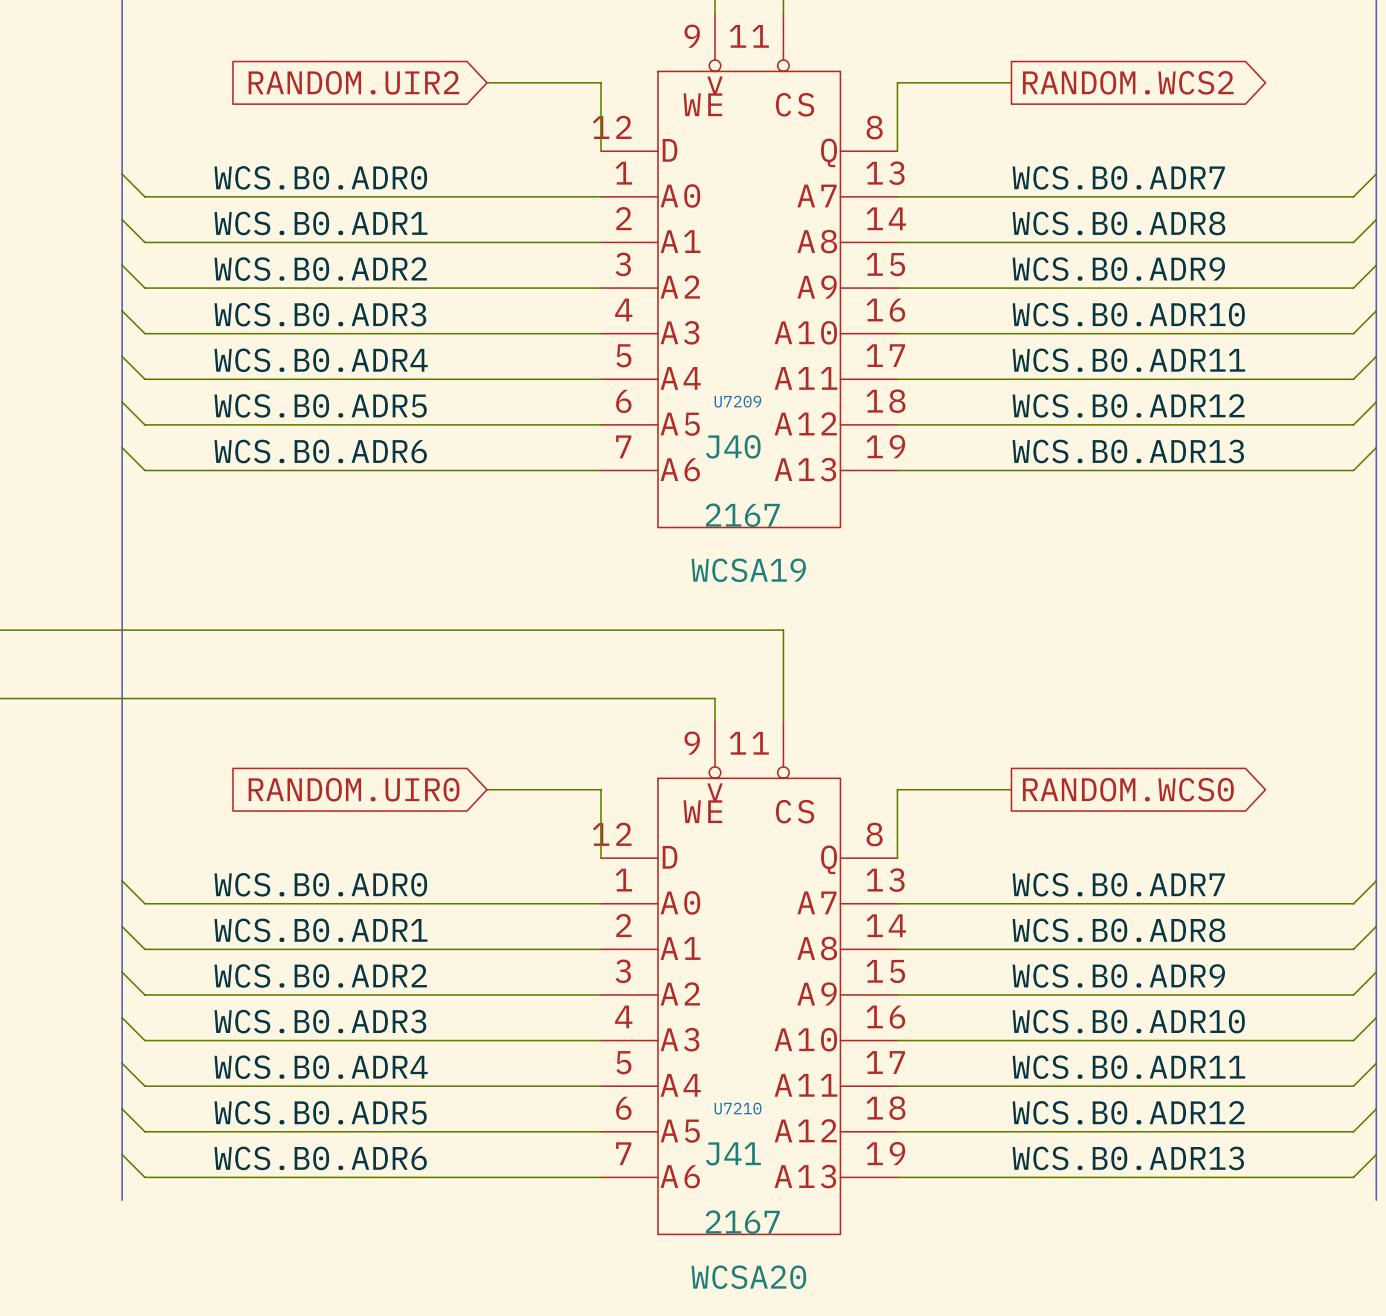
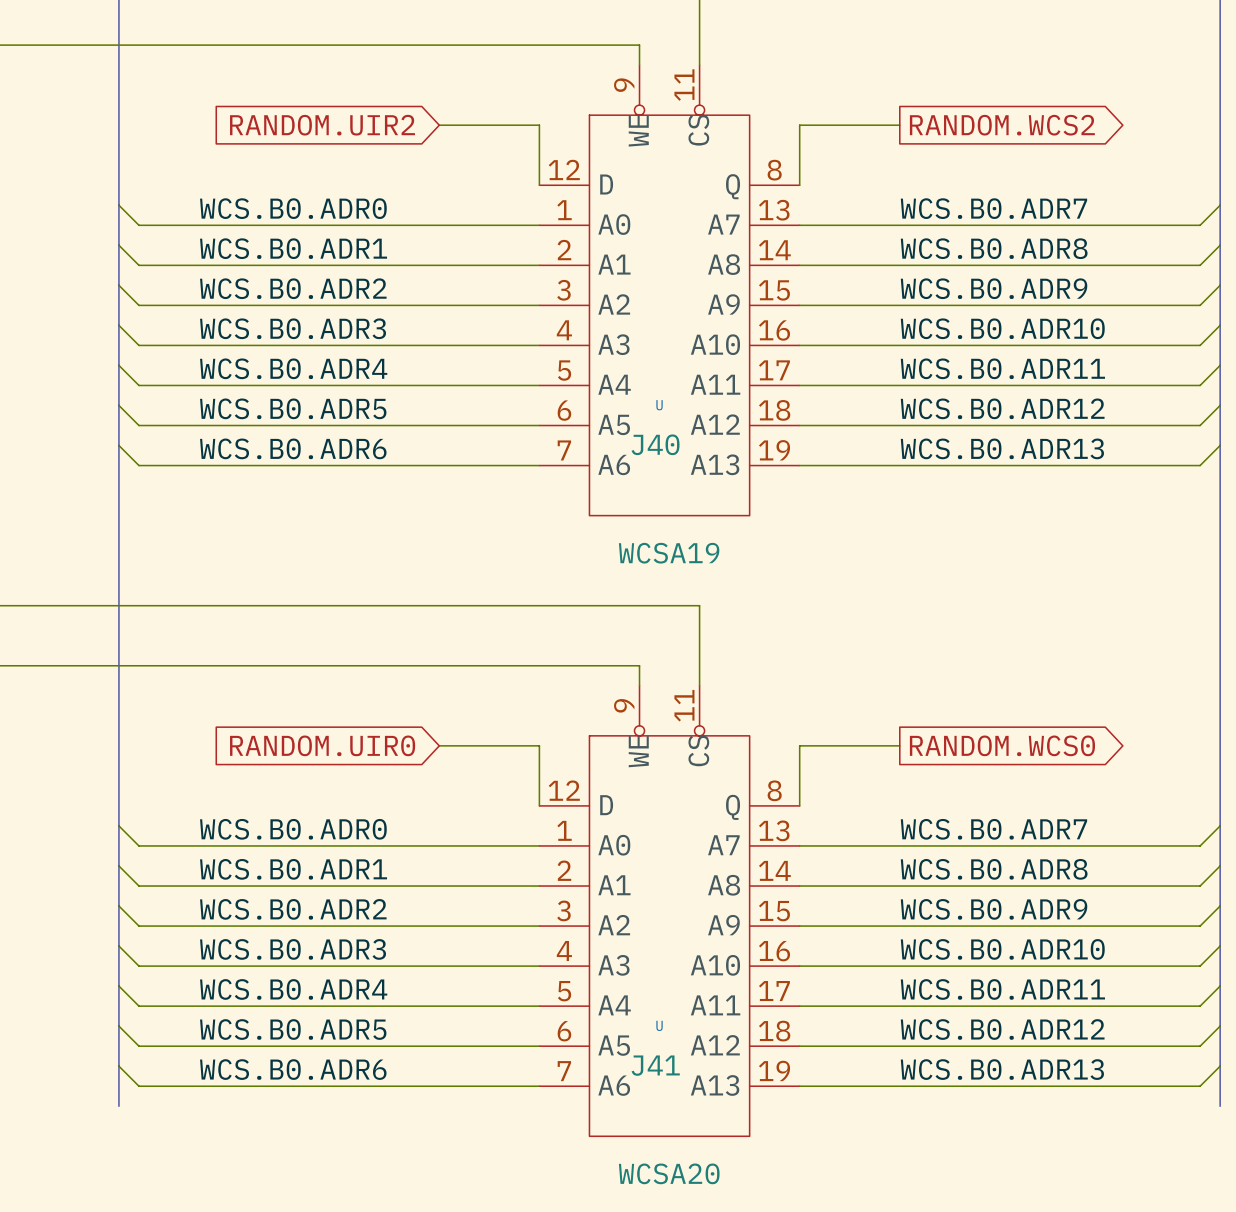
U7209 symbol: [601, 14, 898, 528] -> [539, 65, 800, 516]
U7209 name: U7209 (737, 401) -> U (659, 405)
U7209 value: 2167 (742, 515) -> none
U7210 symbol: [601, 721, 898, 1235] -> [539, 685, 800, 1137]
U7210 name: U7210 (738, 1108) -> U (659, 1025)
U7210 value: 2167 (742, 1222) -> none

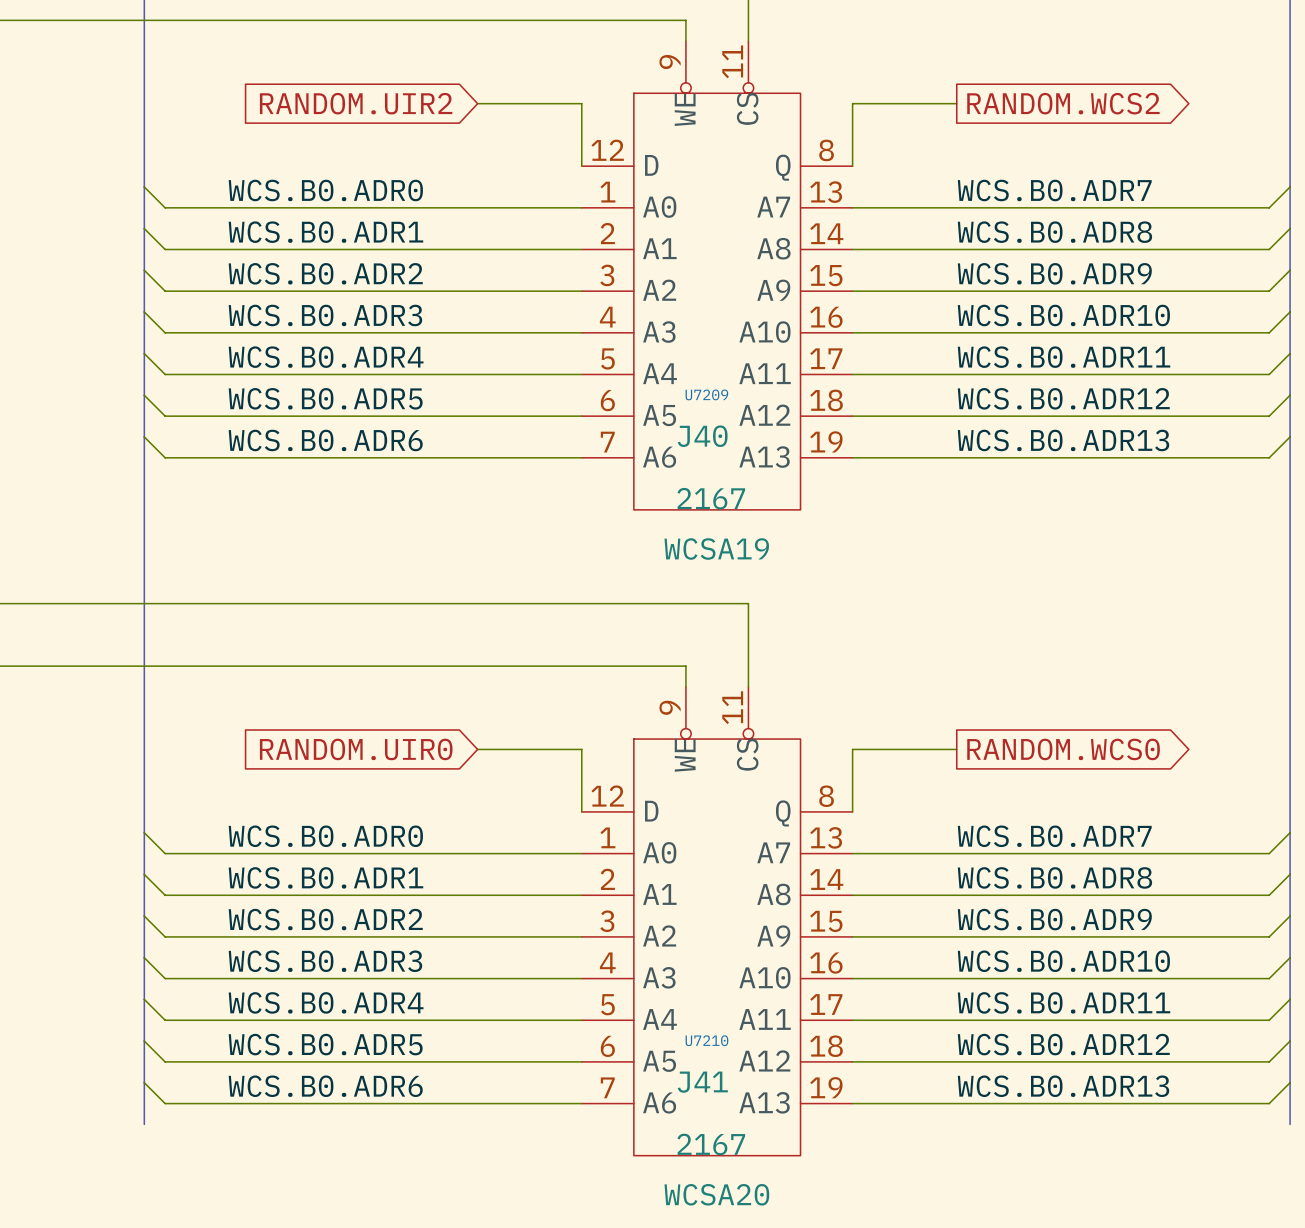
U name: U (659, 405) -> U7209 (706, 394)
U value: none -> 2167 (711, 498)
U name: U (659, 1025) -> U7210 (706, 1040)
U value: none -> 2167 (711, 1144)

